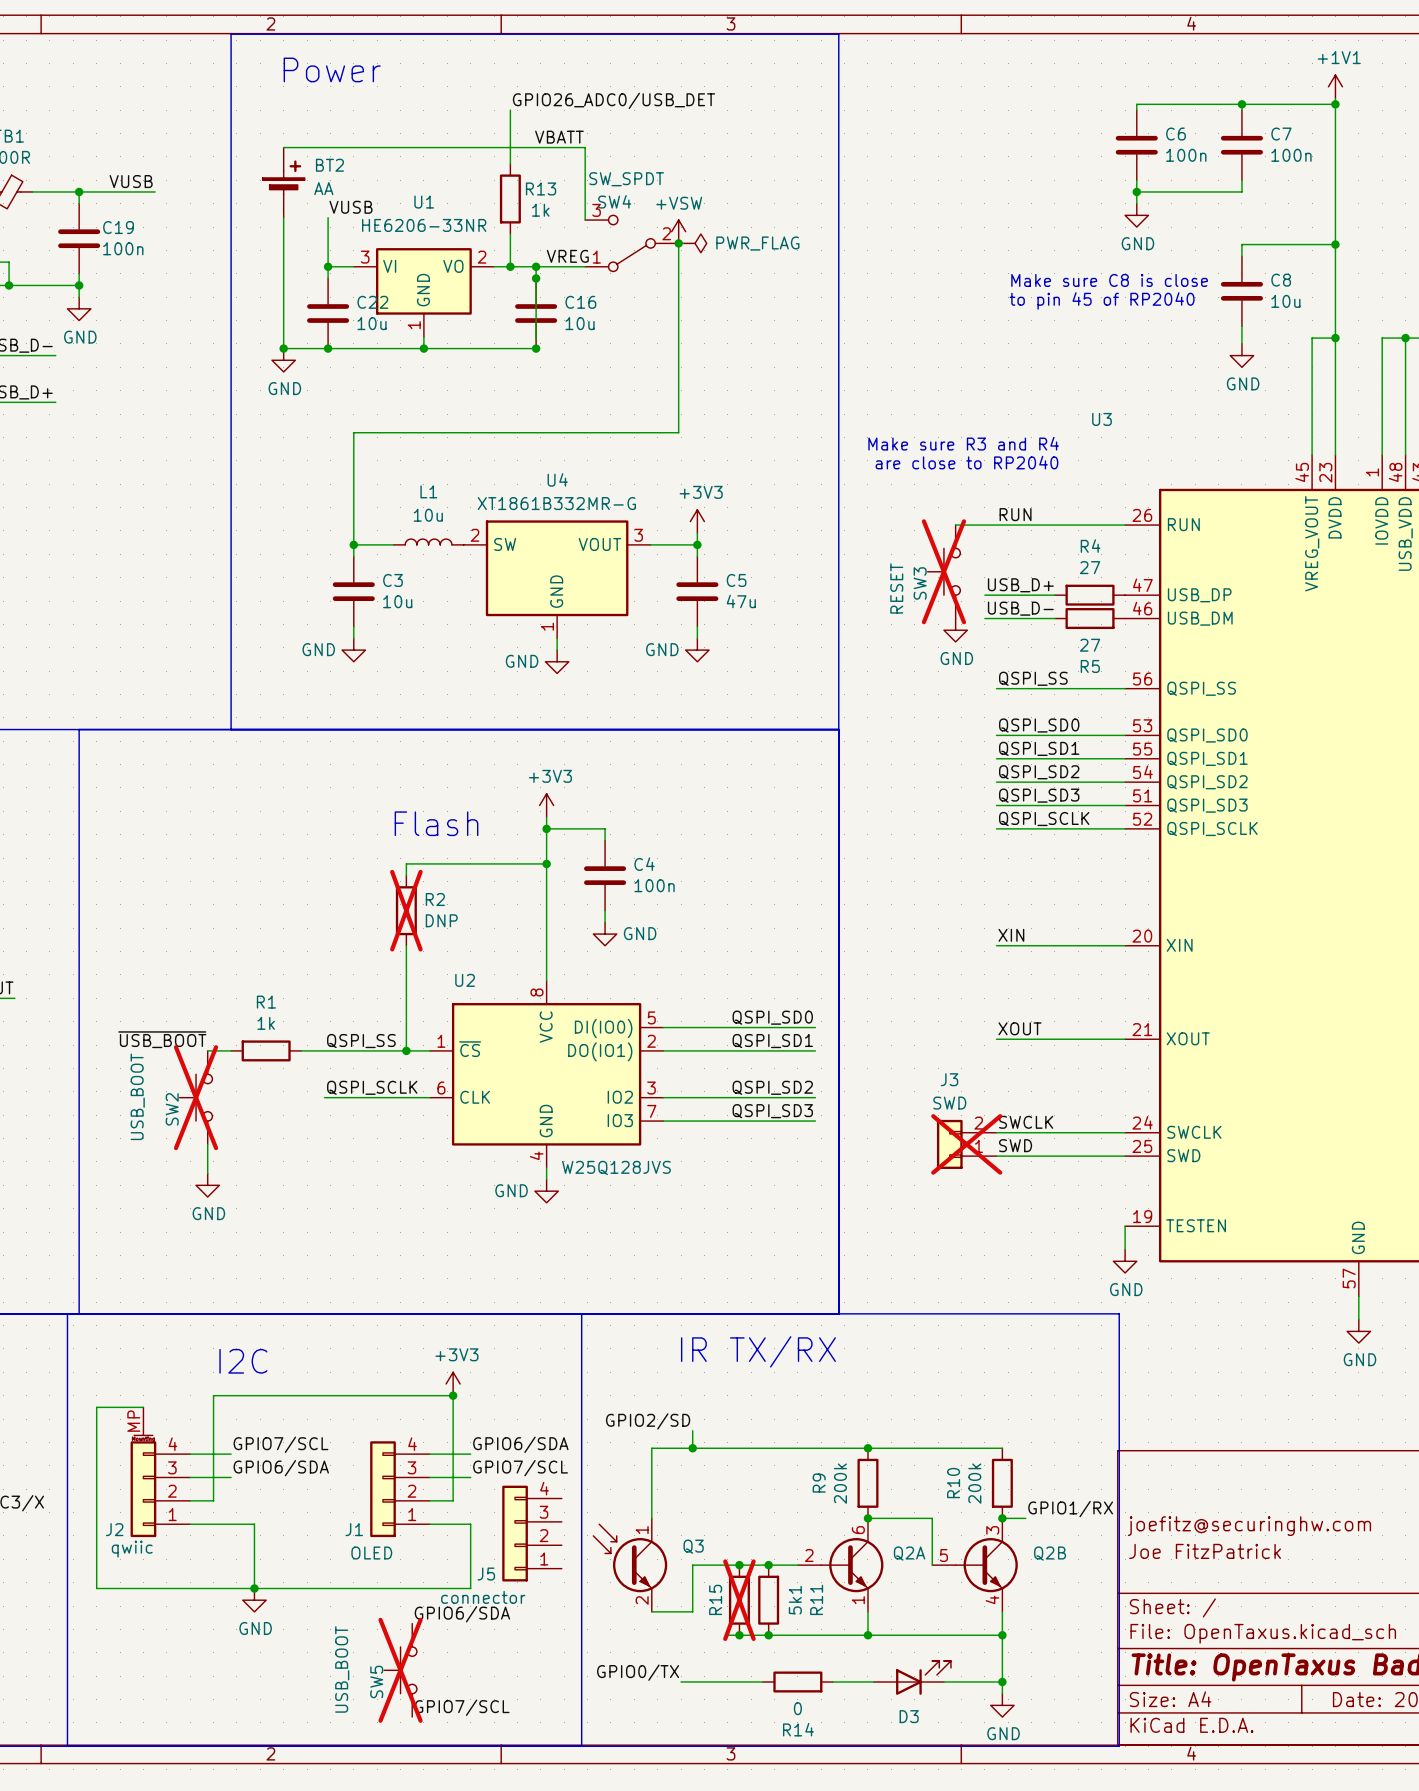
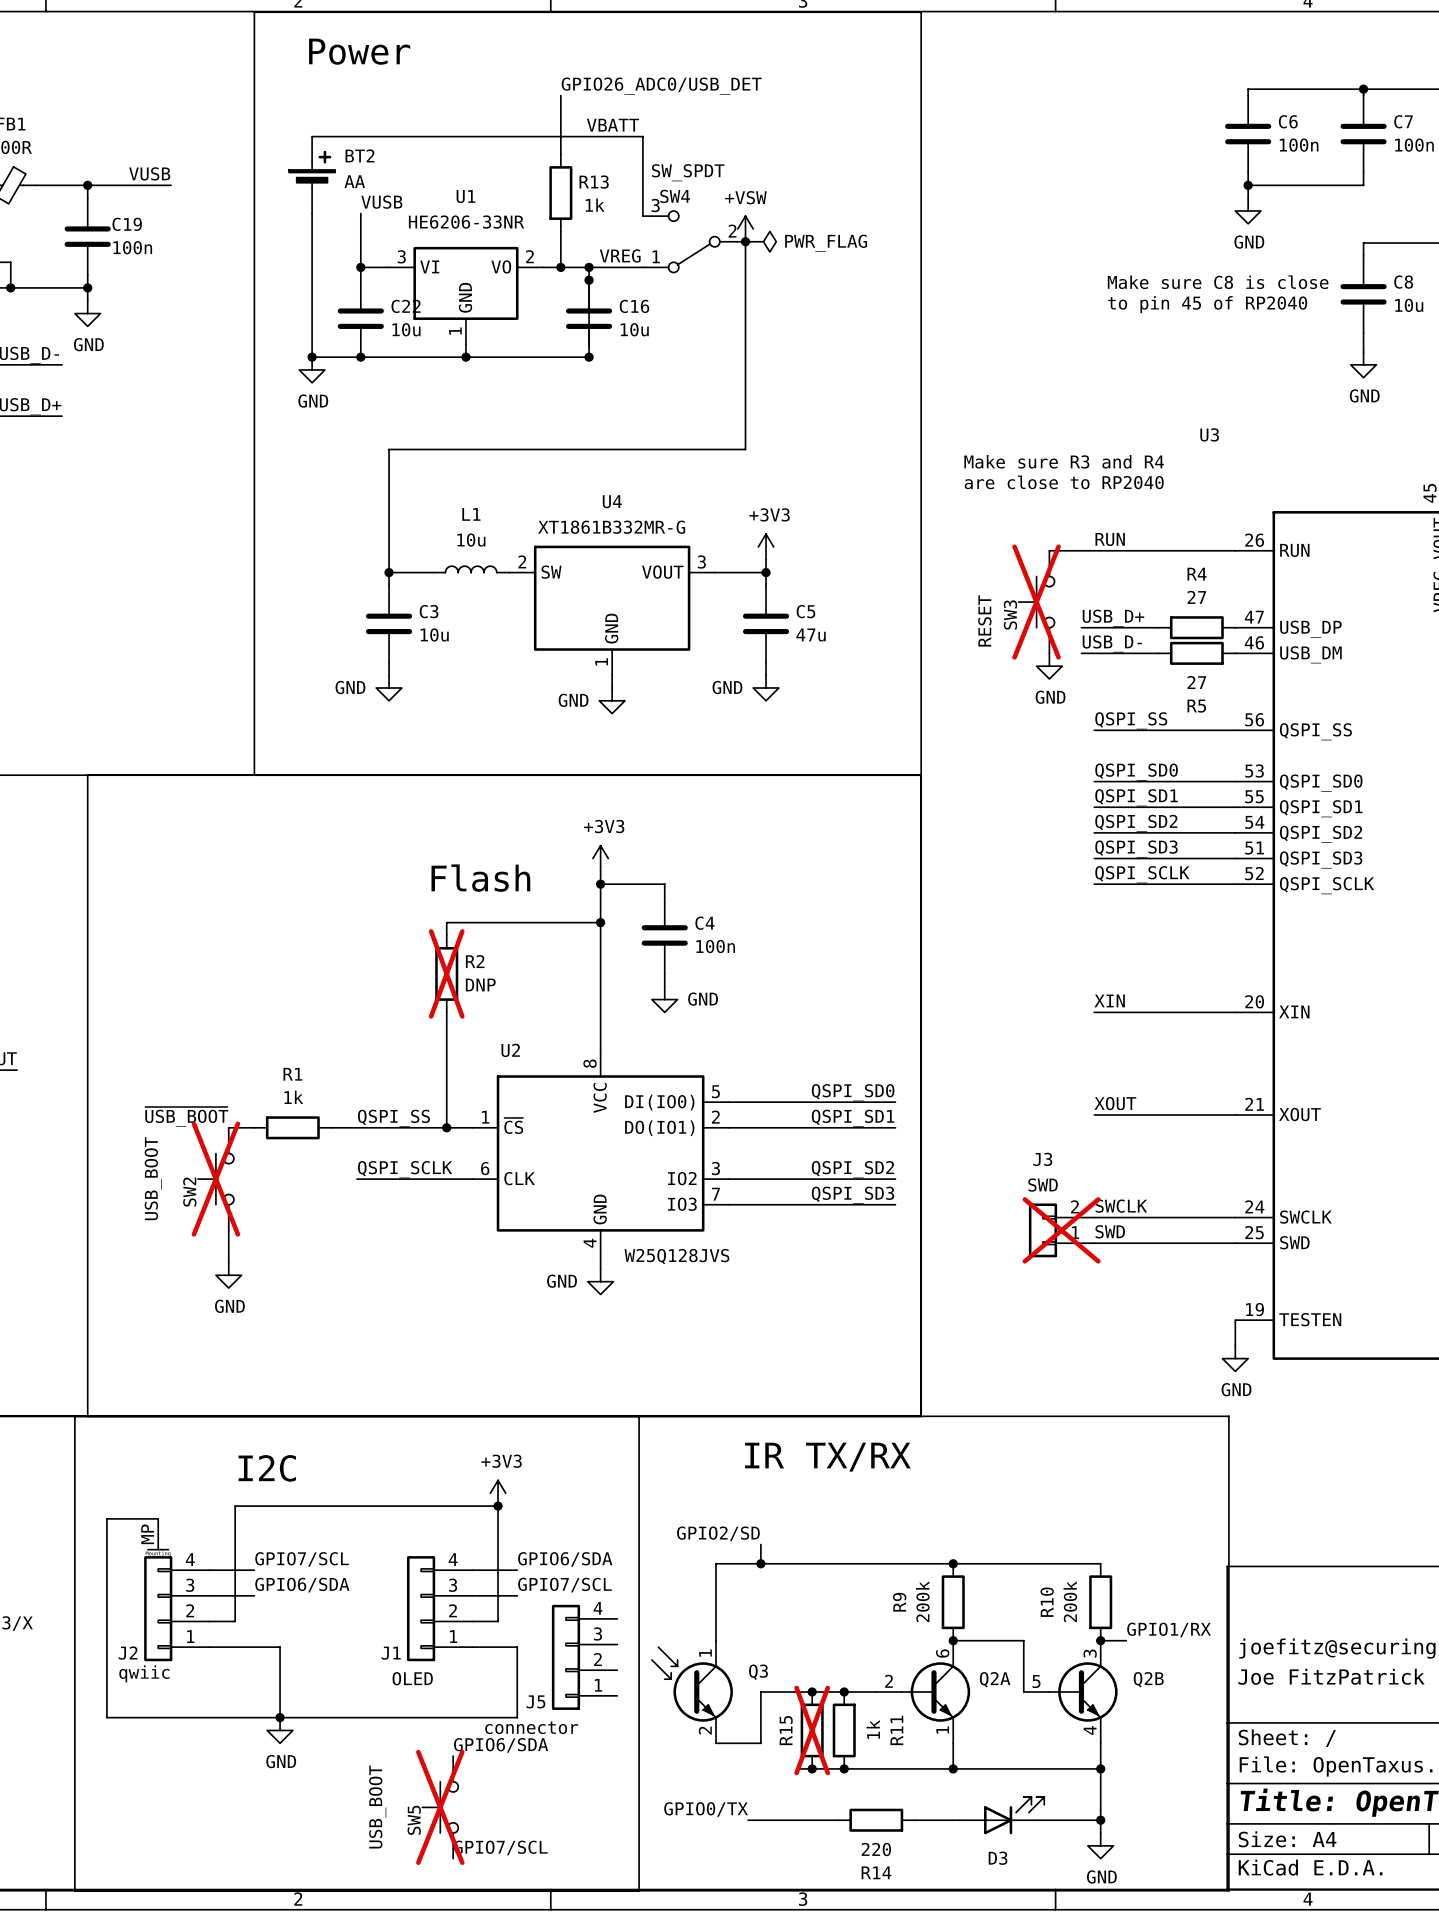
R11 value: 5k1 (795, 1600) -> 1k (873, 1729)
R14 value: 0 (797, 1708) -> 220 (876, 1849)

